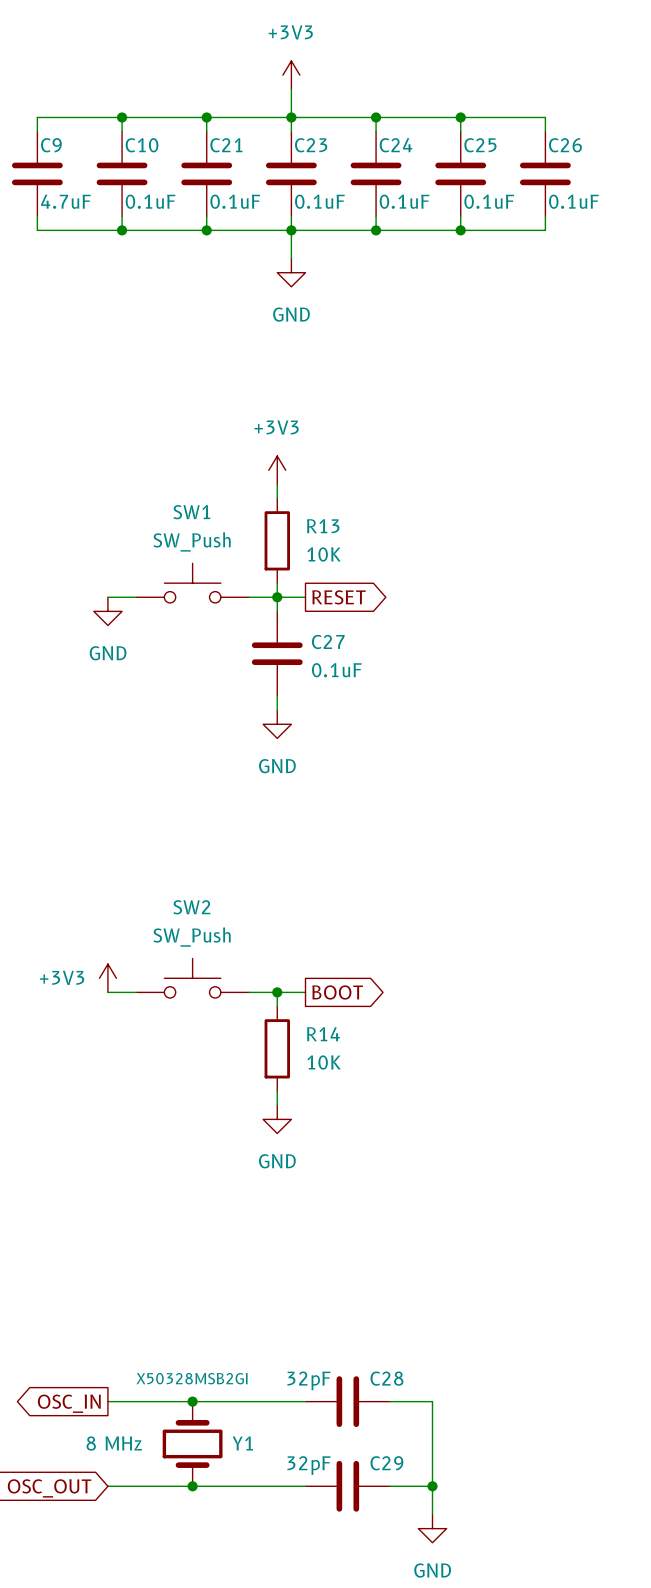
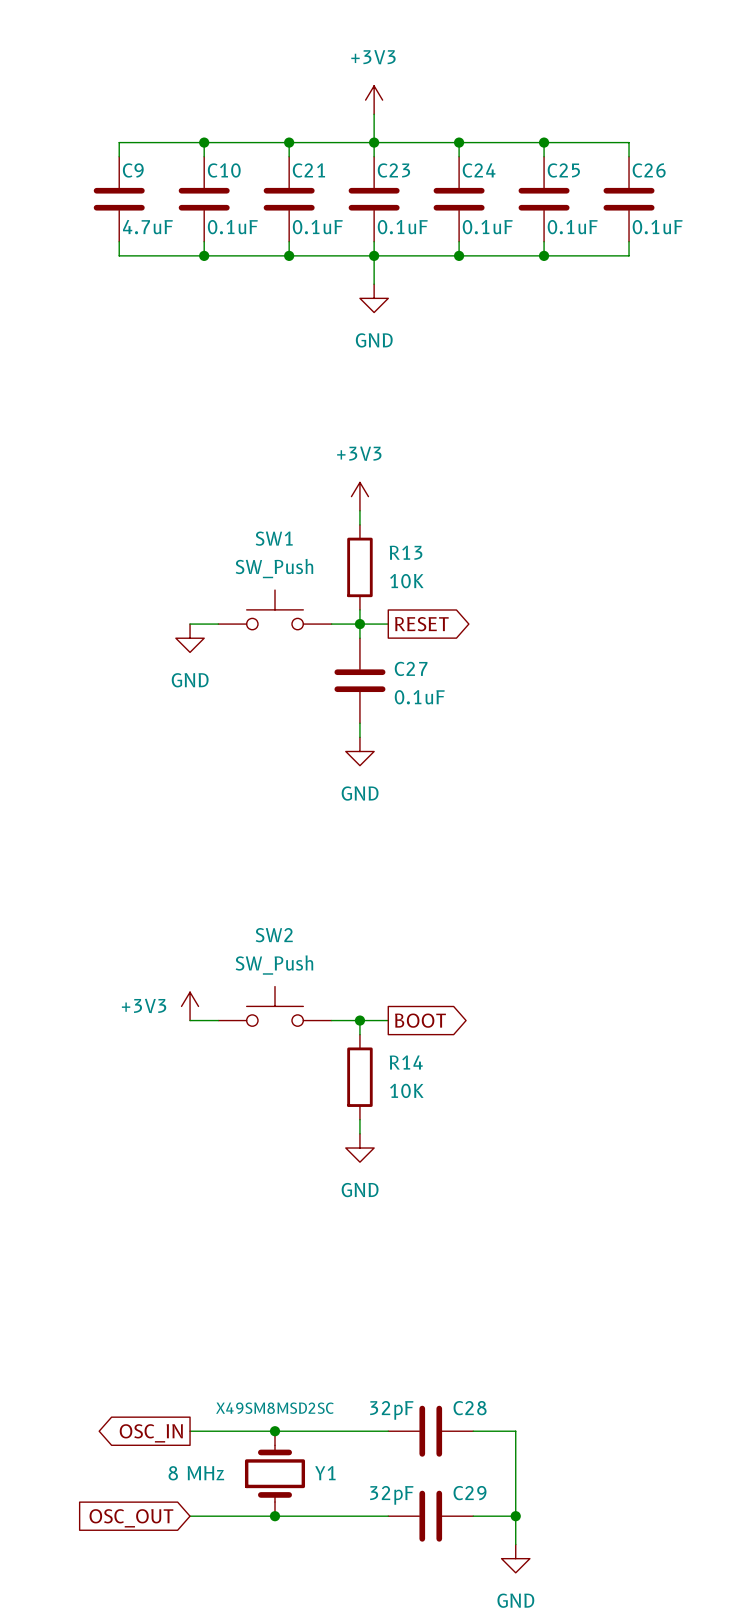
Y1 text: X50328MSB2GI (192, 1378) -> X49SM8MSD2SC (274, 1408)

